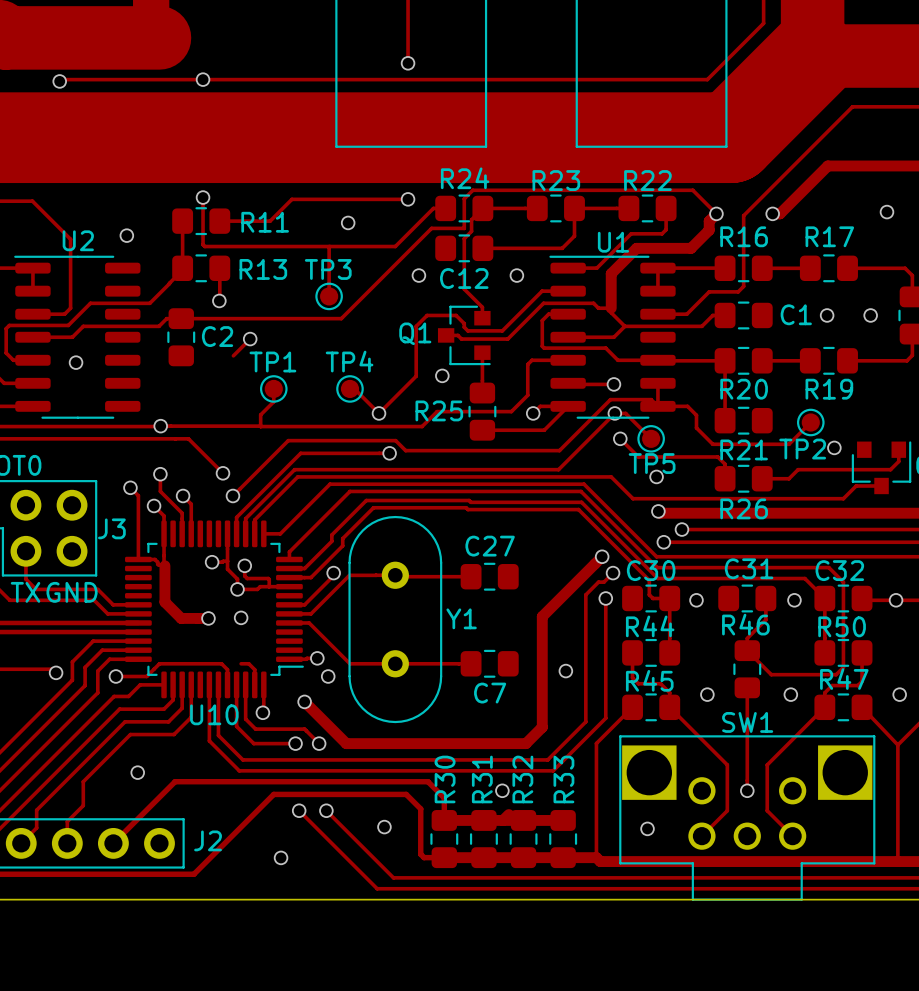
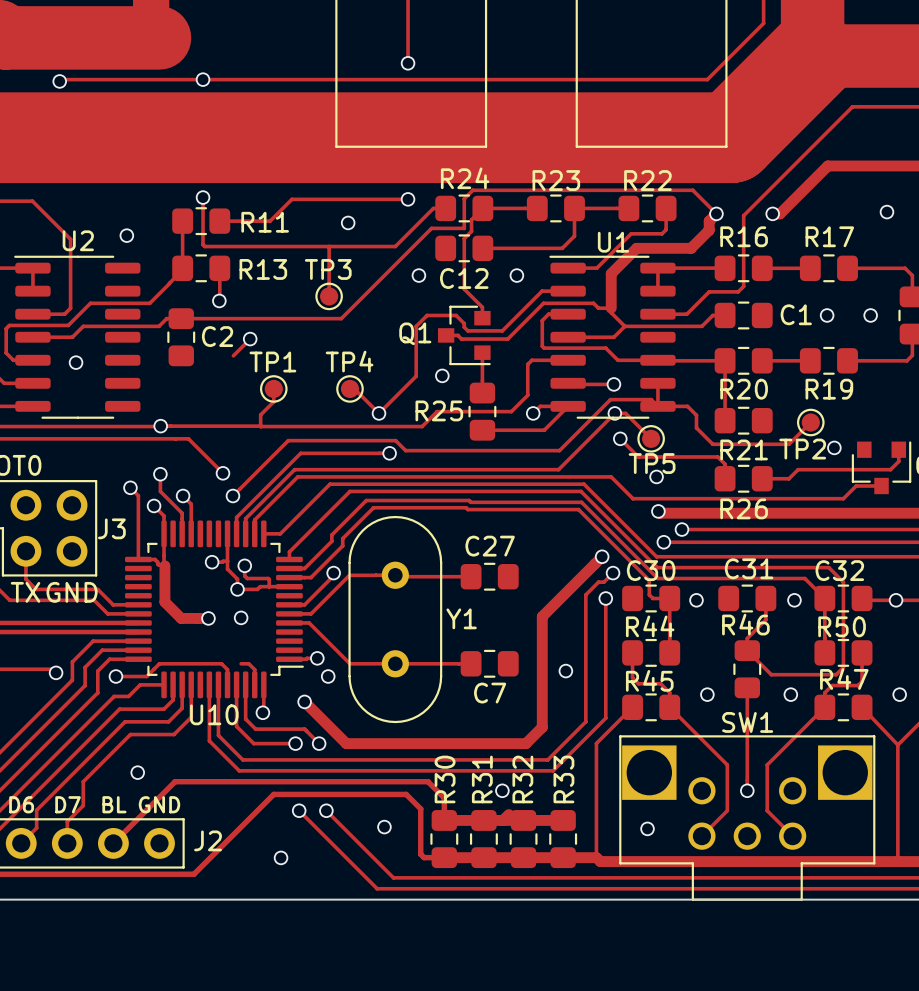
text: none -> D6 (21, 804)
text: none -> D7 (68, 804)
text: none -> BL (114, 804)
text: none -> GND (159, 804)

